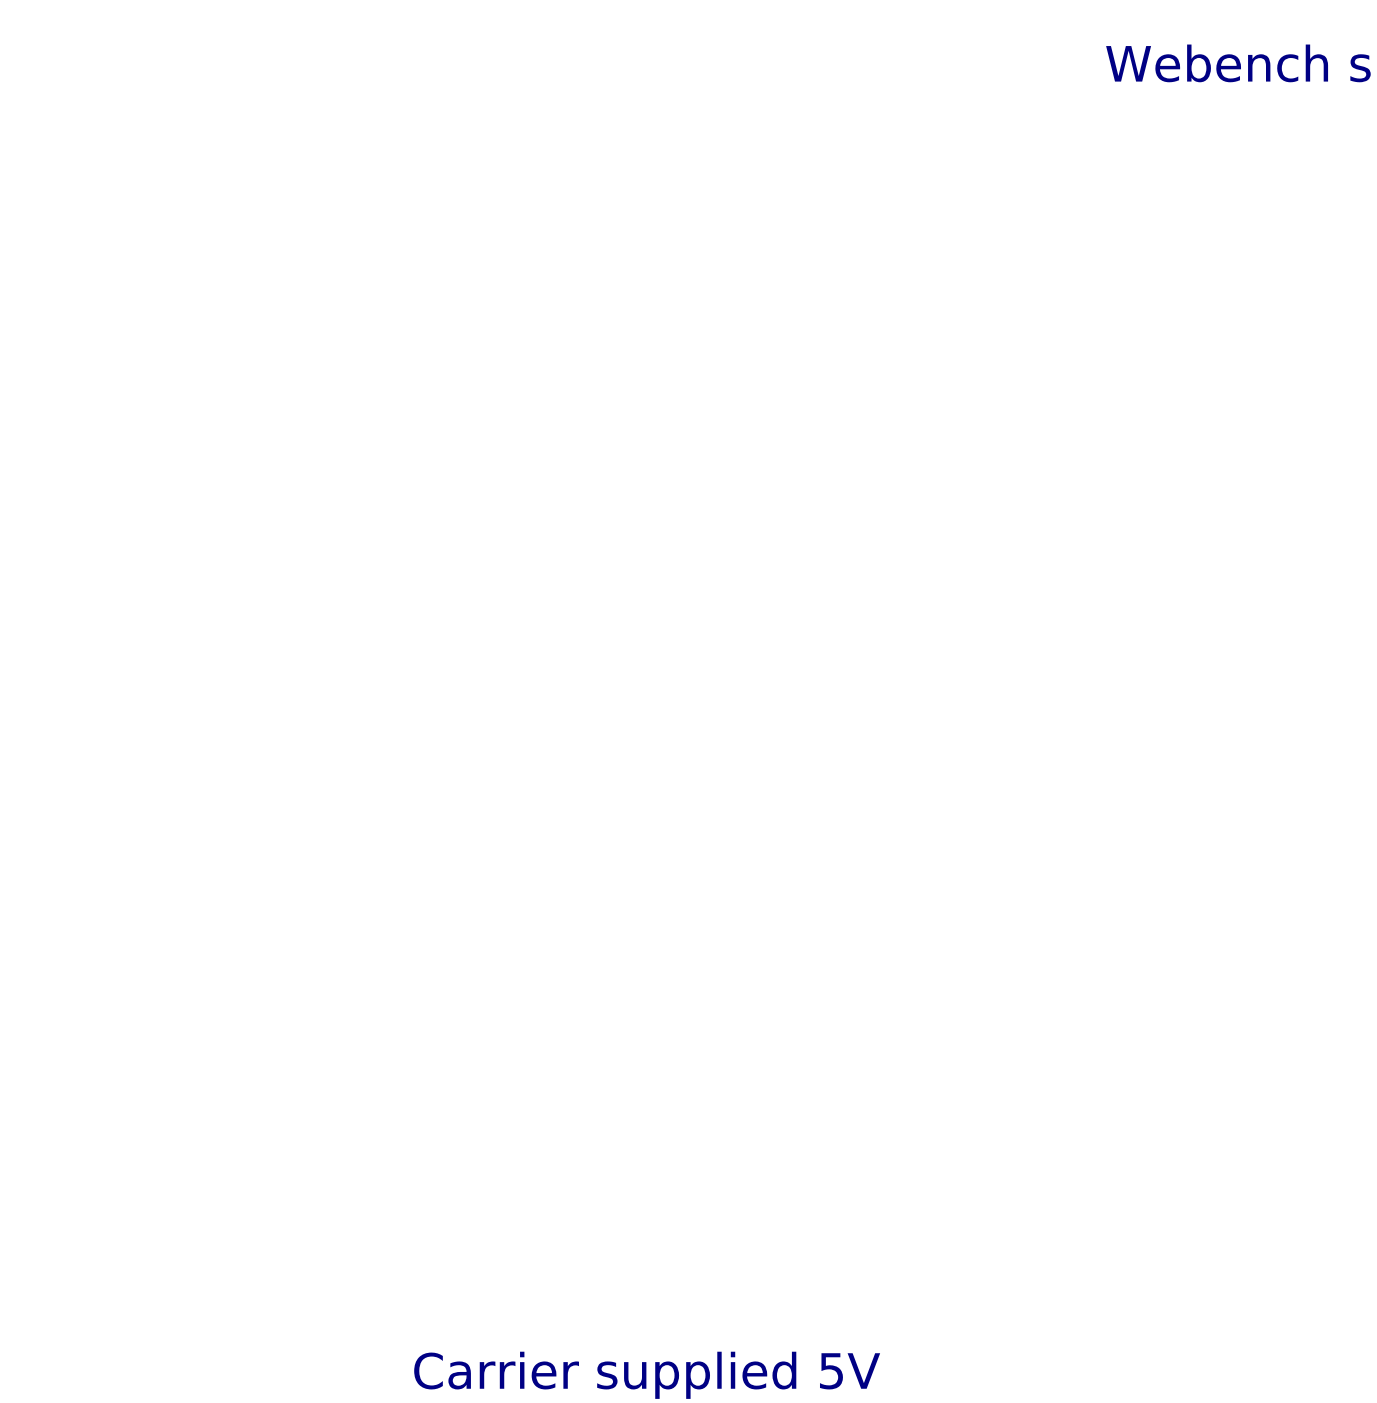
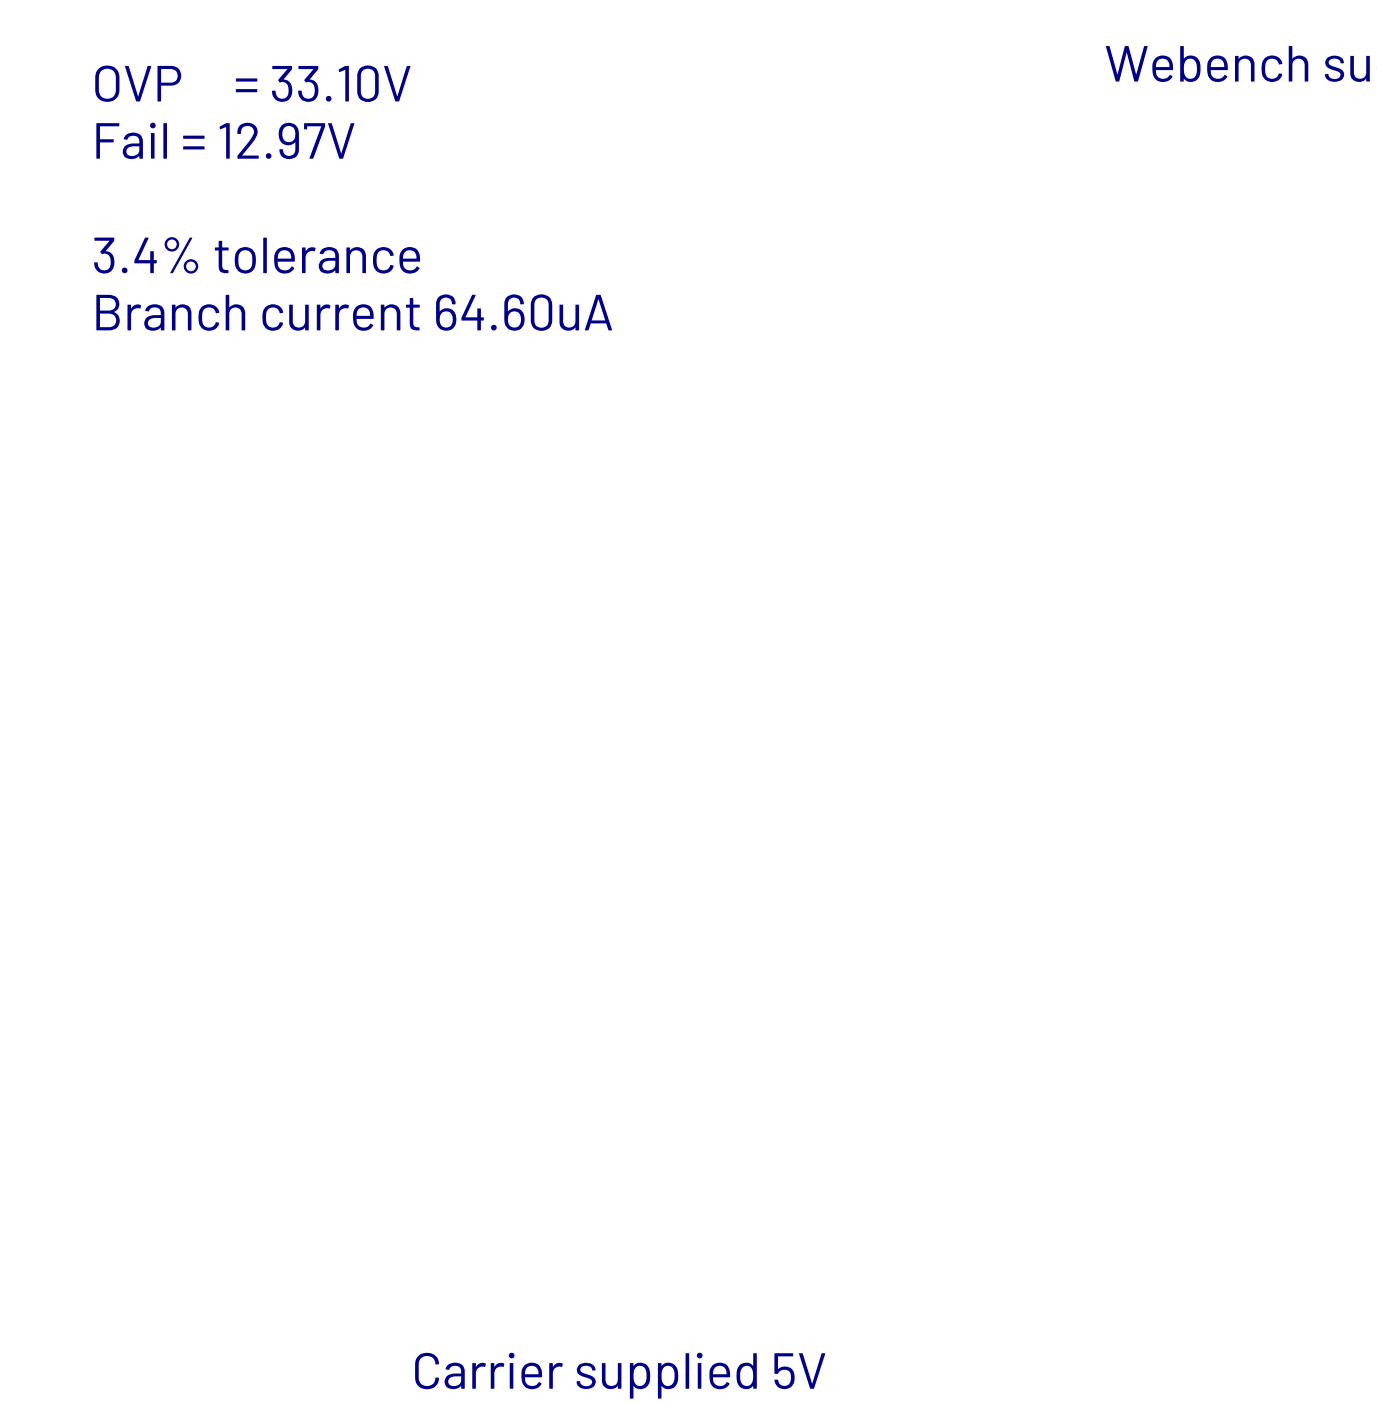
text: none -> OVP = 33.10V (252, 83)
text: none -> Fail = 12.97V (225, 140)
text: none -> 3.4% tolerance (257, 255)
text: none -> Branch current 64.60uA (354, 312)

